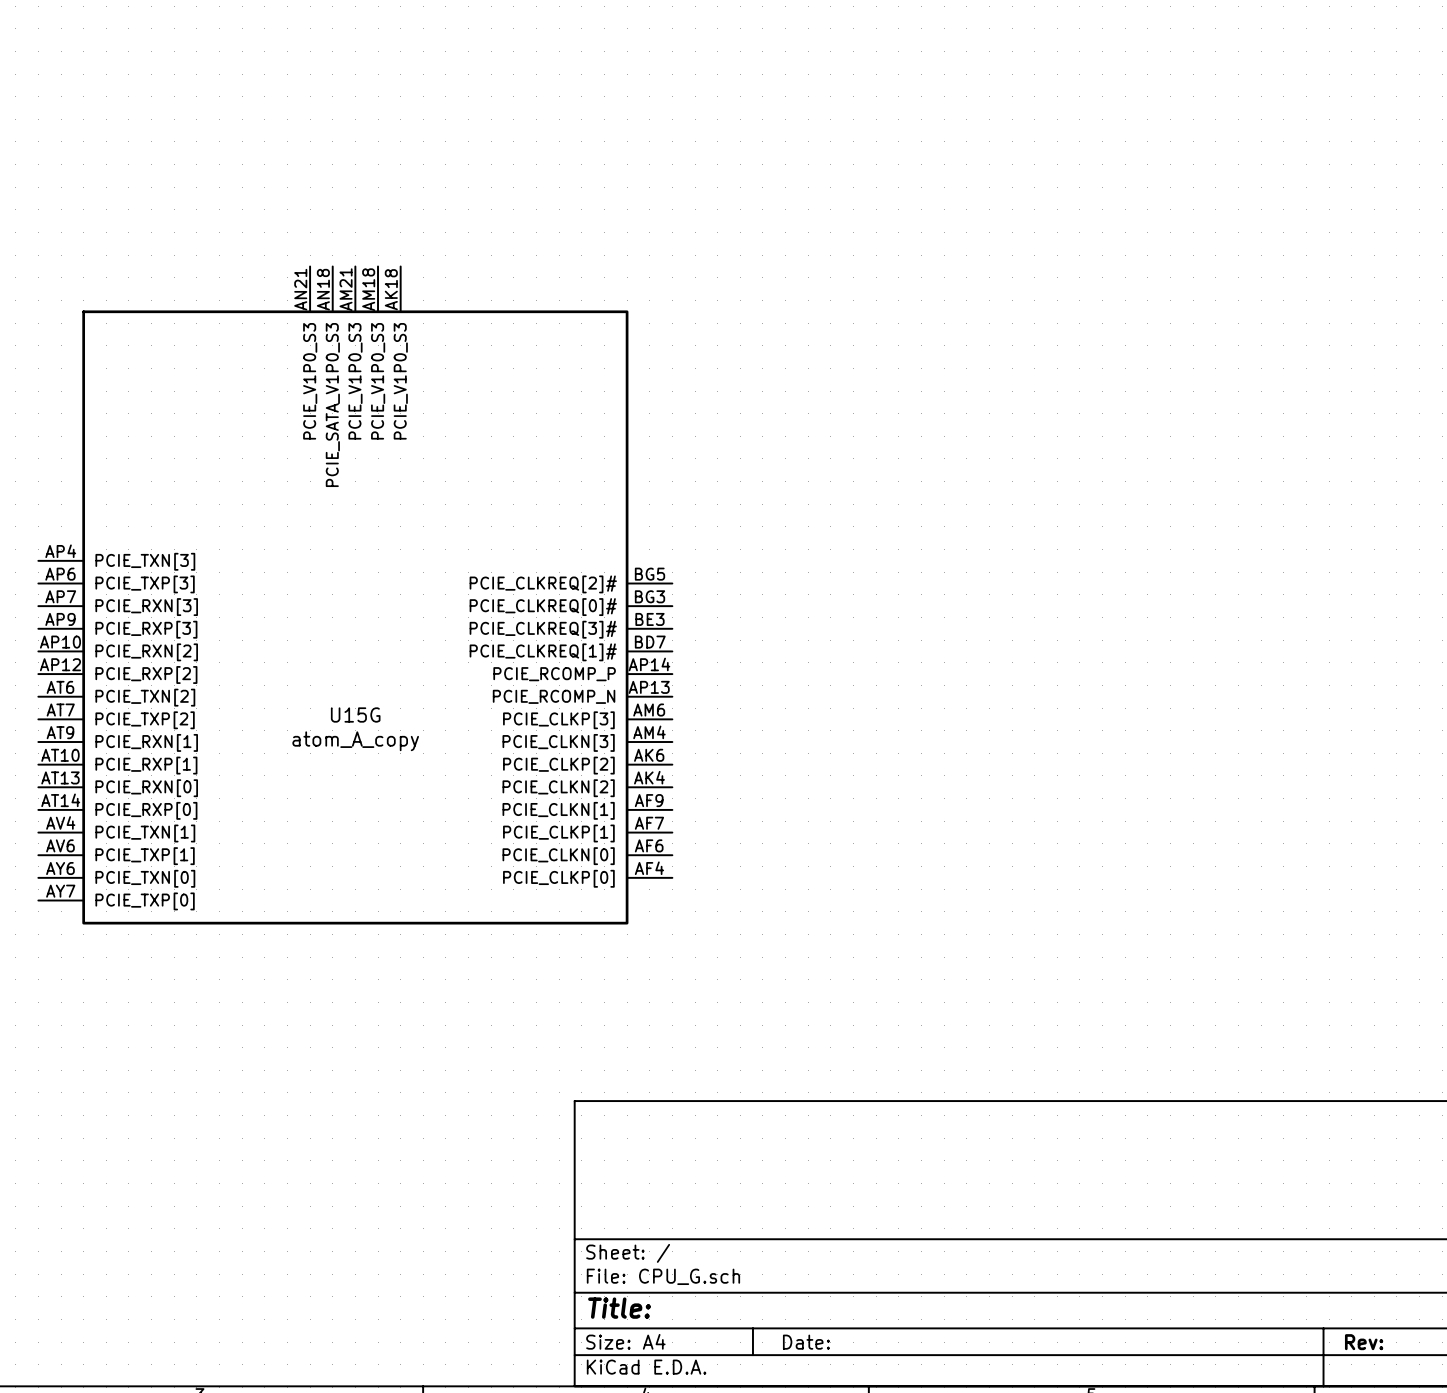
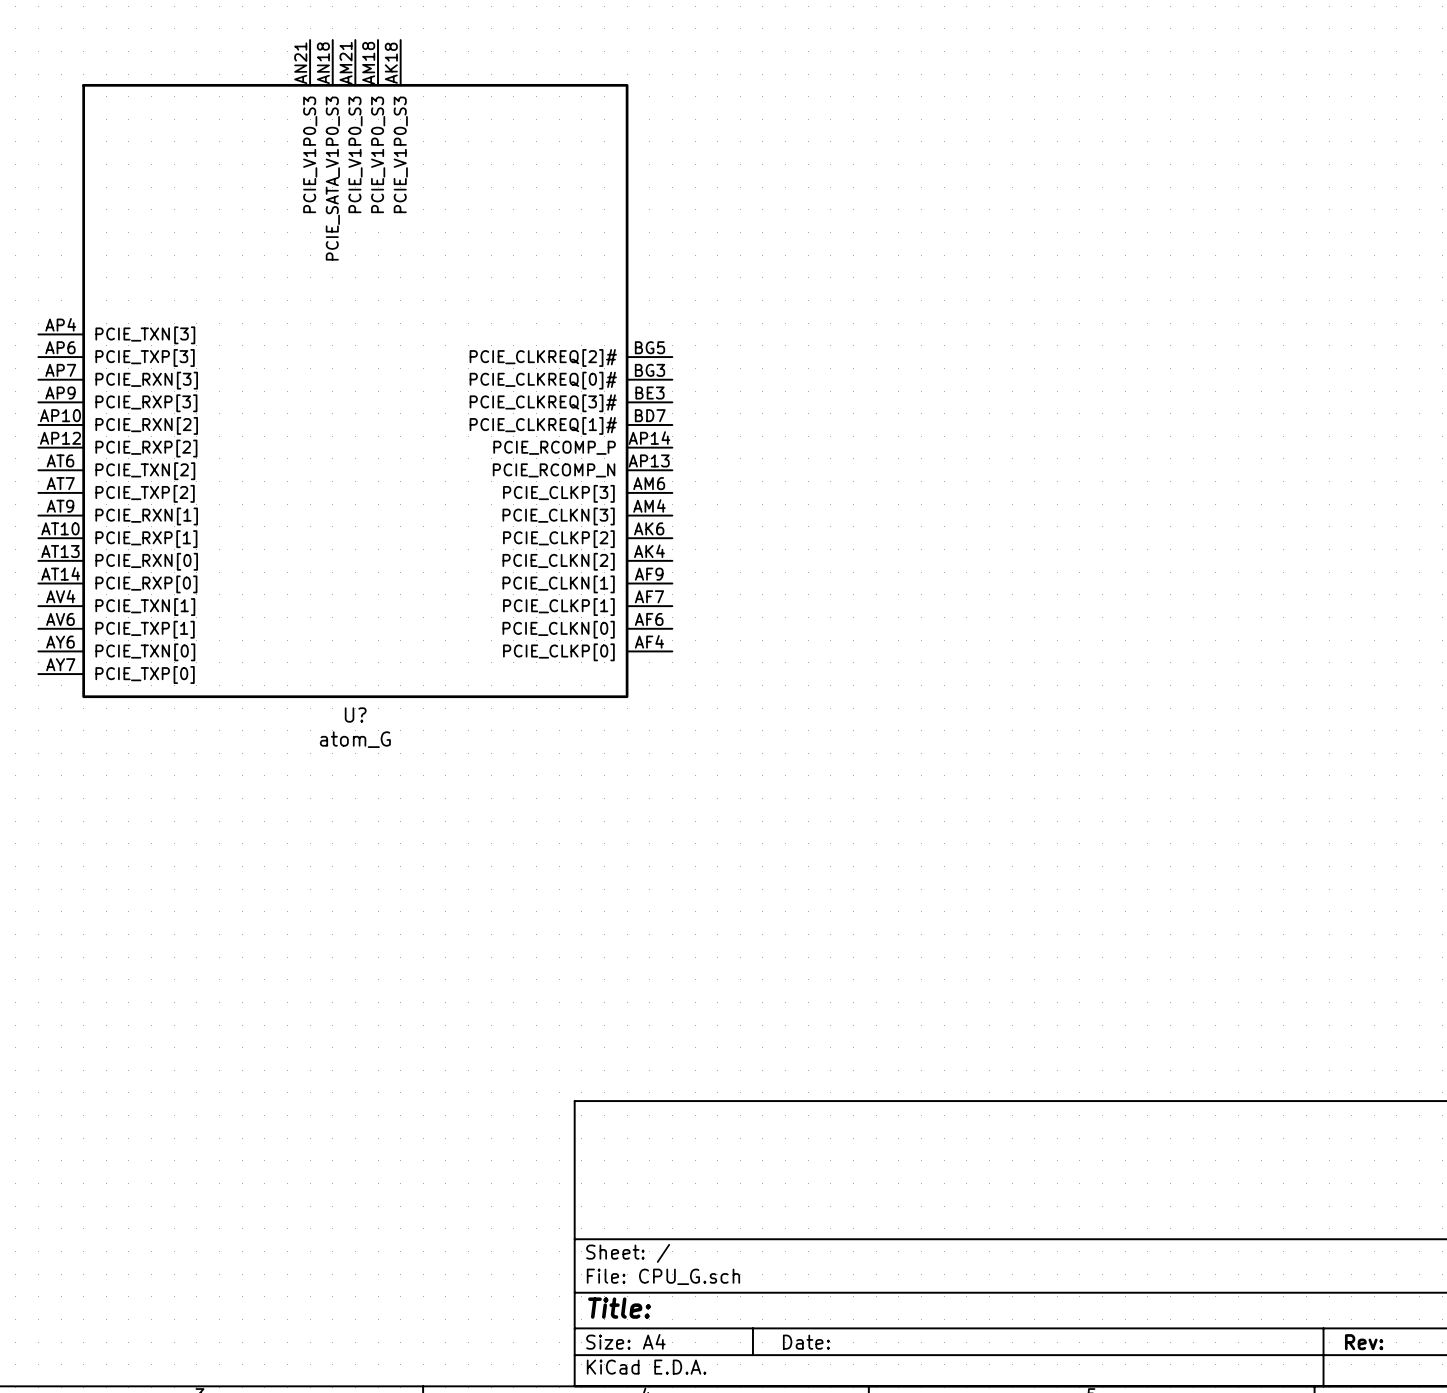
U?: none -> atom_G (355, 369)
U15G: atom_A_copy (355, 595) -> none

